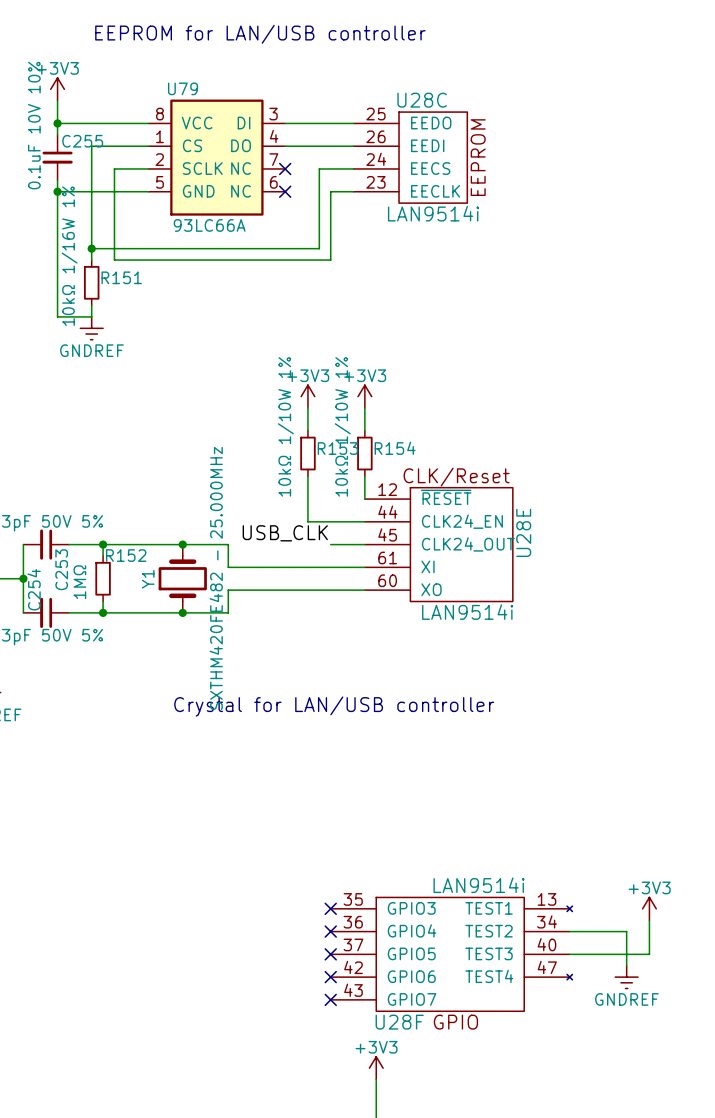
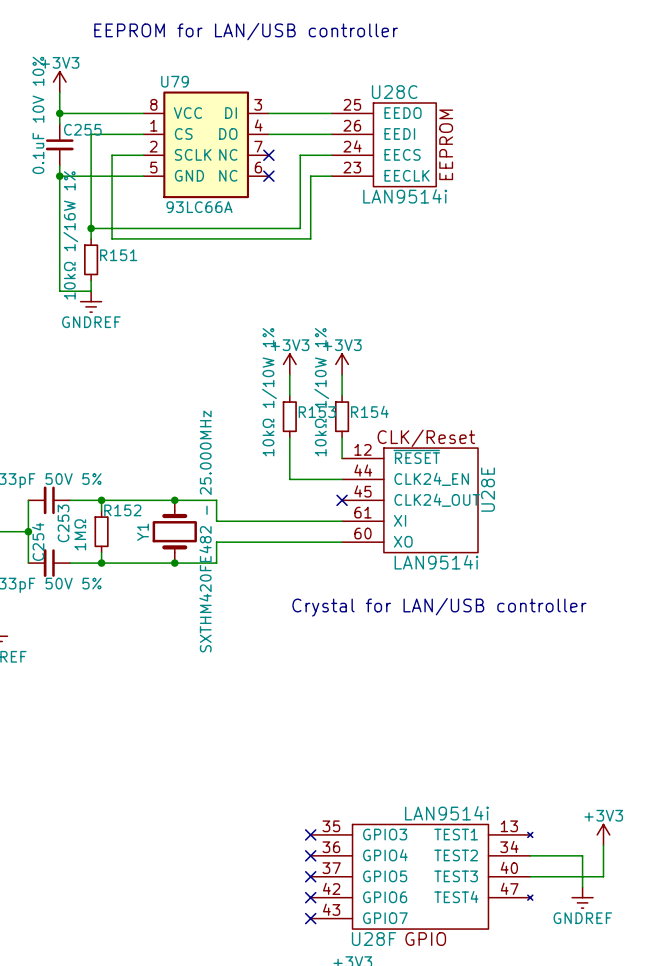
label: USB_CLK (285, 533) -> none
wire: (330, 544) (364, 544) -> none
no-connect mark: none -> (342, 500)
text position: Crystal for LAN/USB controller (334, 706) -> Crystal for LAN/USB controller (439, 607)

